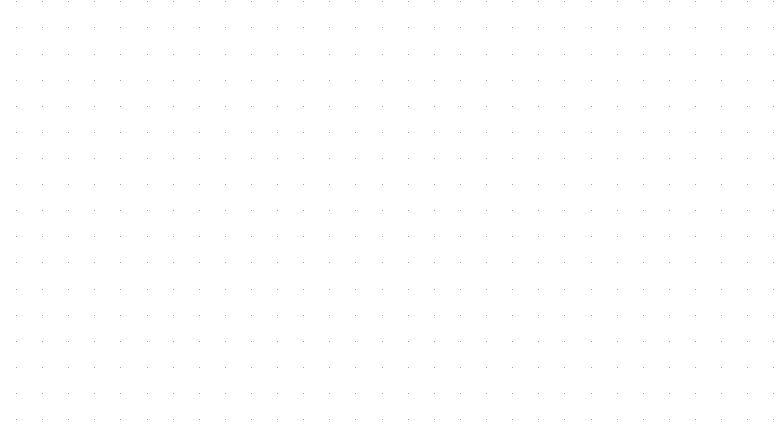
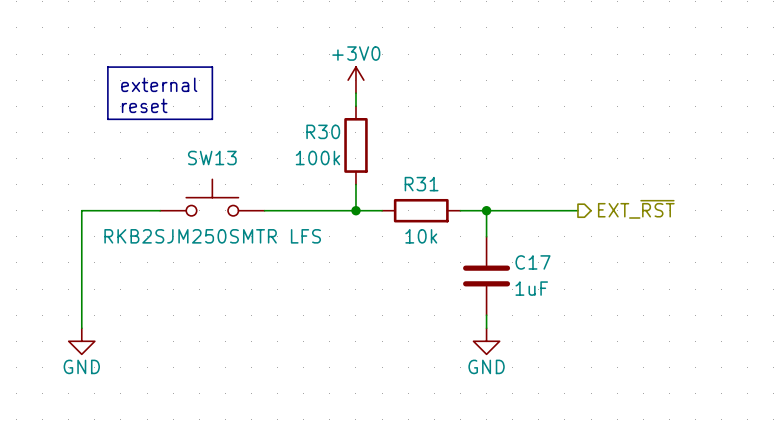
line: none -> (107, 67) (212, 67) (212, 119) (107, 119) (107, 67)
power symbol: none -> +3V0 (355, 80)
text: none -> external (159, 84)
wire: none -> (355, 93) (355, 106)
text: none -> reset (144, 105)
R30: none -> 100k (355, 145)
wire: none -> (355, 184) (355, 210)
SW13: none -> RKB2SJM250SMTR LFS (212, 197)
hierarchical label: none -> EXT_~{RST} (636, 209)
wire: none -> (160, 210) (81, 210) (81, 328)
wire: none -> (264, 210) (382, 210)
junction: none -> (355, 210)
R31: none -> 10k (421, 210)
wire: none -> (460, 210) (577, 210)
wire: none -> (486, 210) (486, 236)
junction: none -> (486, 210)
C17: none -> 1uF (486, 276)
wire: none -> (486, 315) (486, 328)
power symbol: none -> GND (81, 341)
power symbol: none -> GND (486, 341)

